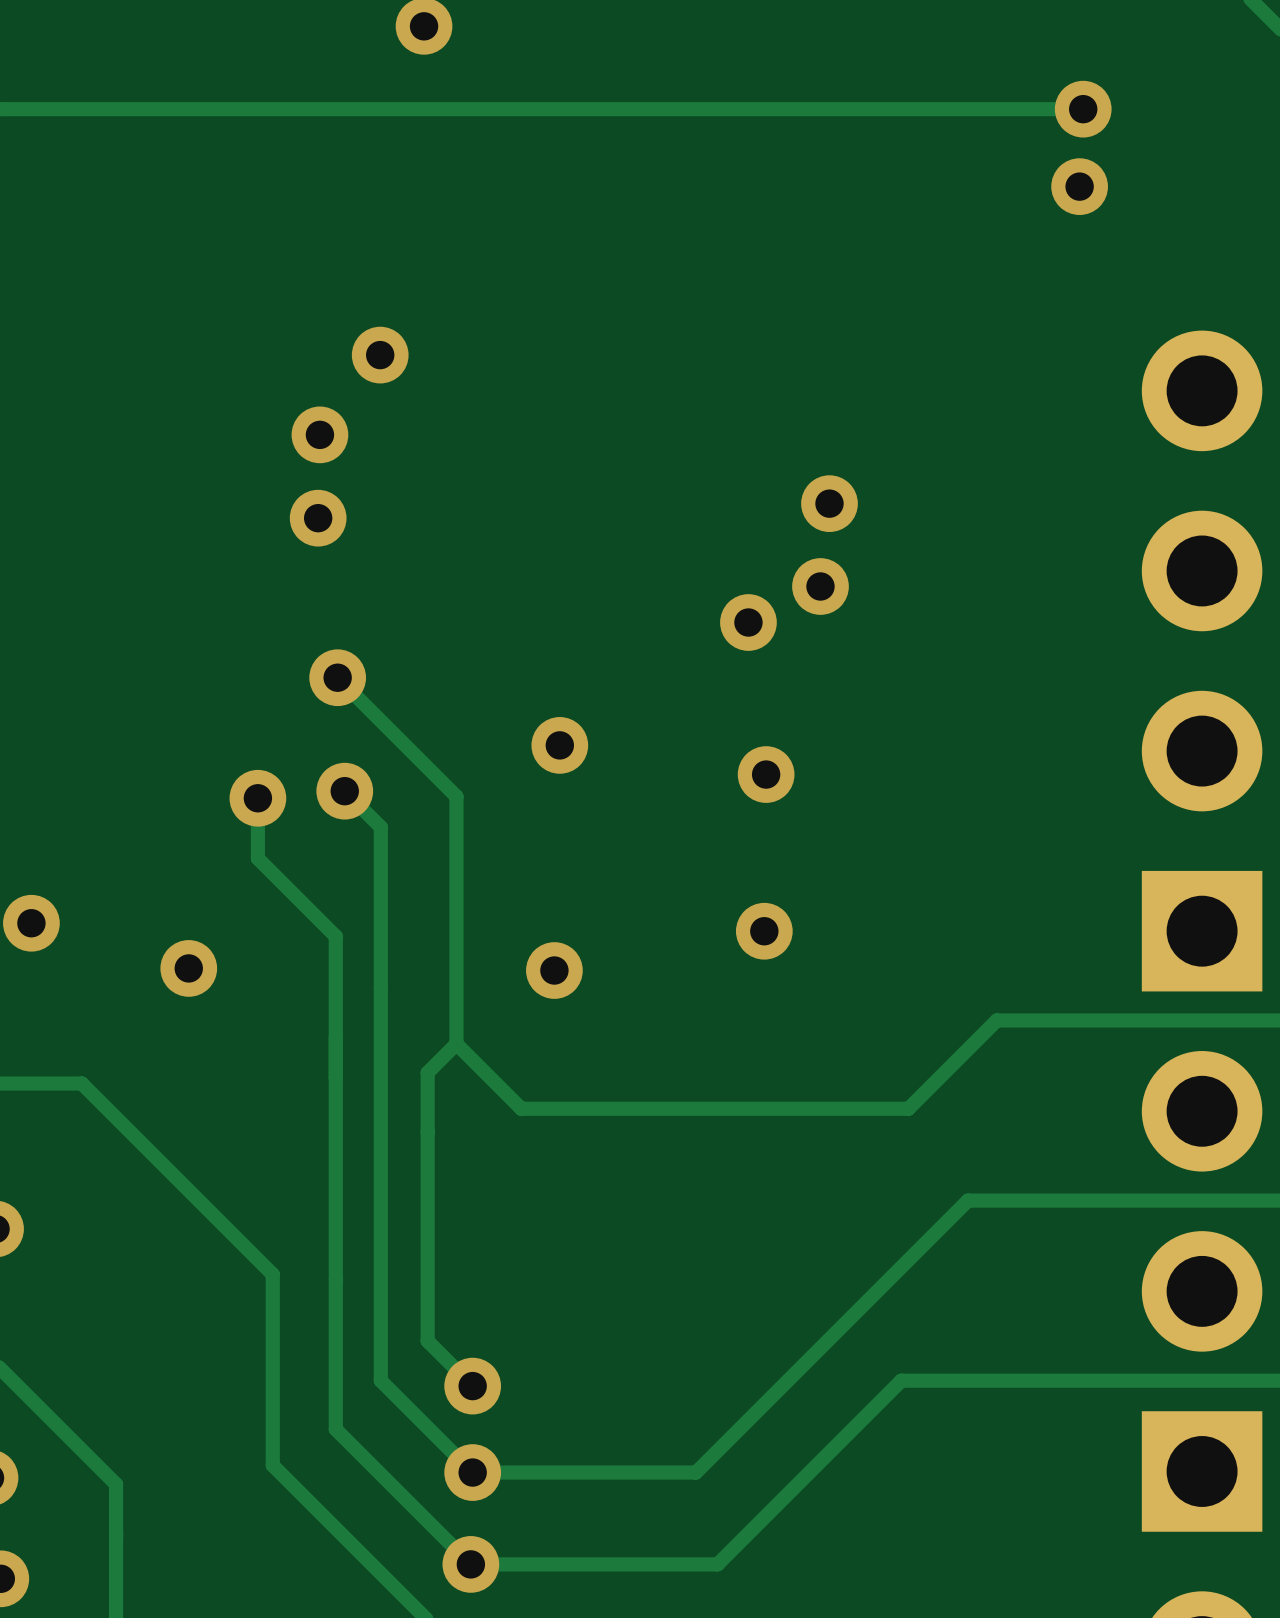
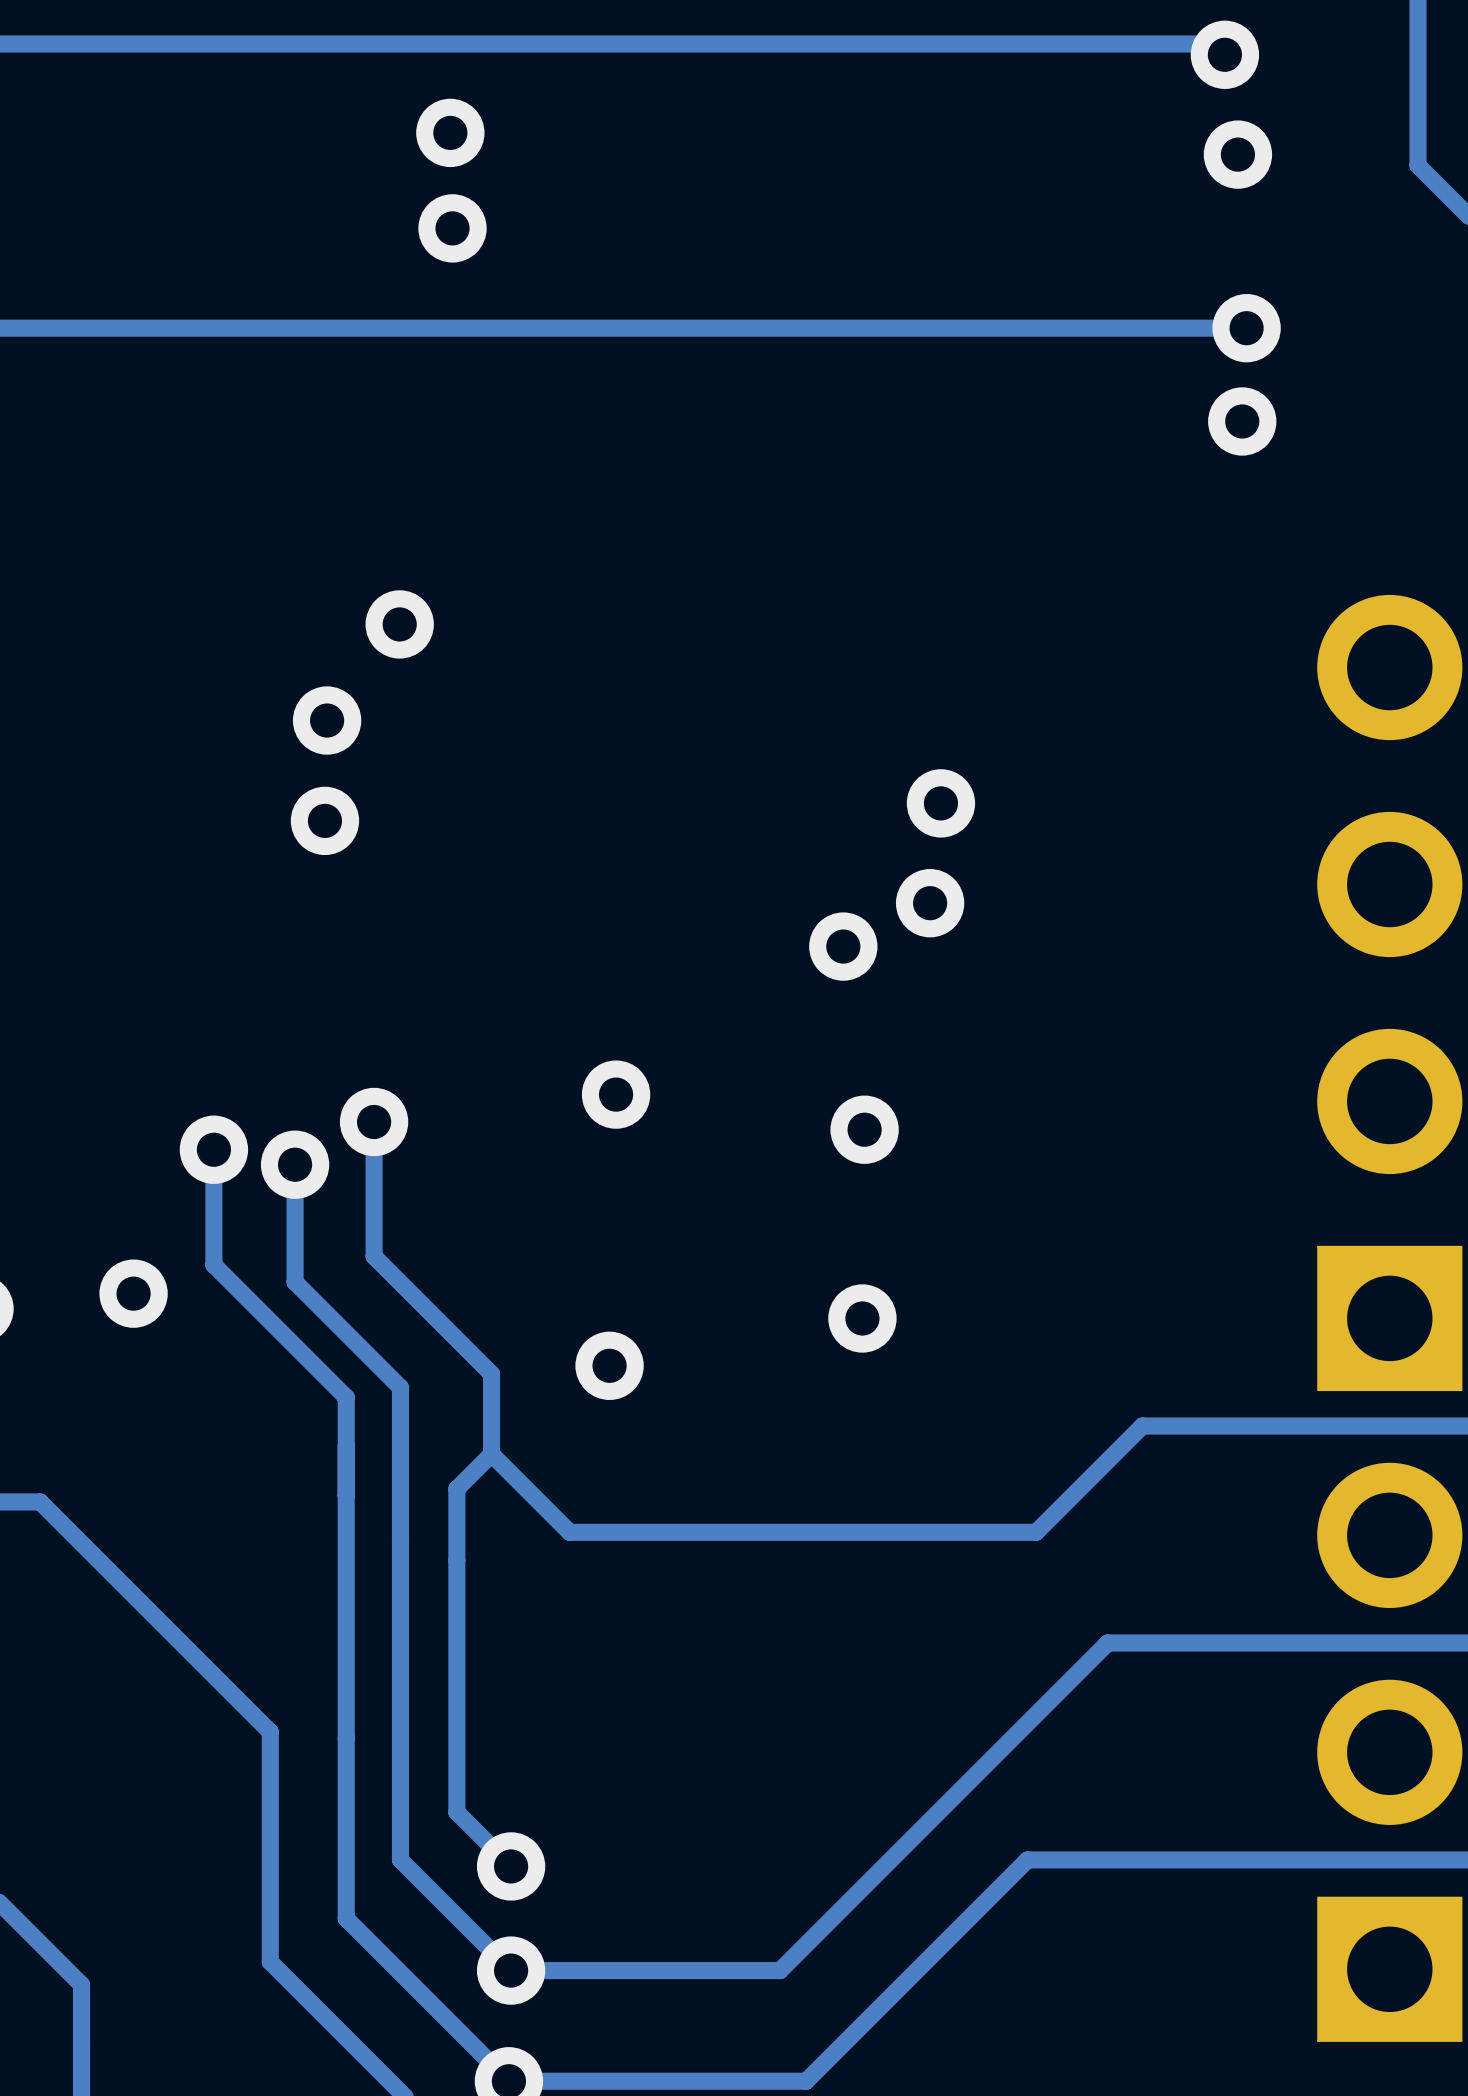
track: (337, 677) (456, 796) (456, 977) -> (374, 1121) (374, 1256) (491, 1373)
via: (337, 677) -> none
via: none -> (374, 1121)
via: none -> (213, 1149)
track: (344, 791) (380, 827) (380, 988) -> (295, 1164) (295, 1282) (400, 1387)
via: (344, 791) -> none
track: (257, 798) (257, 858) (335, 936) (335, 996) -> (213, 1149) (213, 1265) (346, 1397)
via: (257, 798) -> none
via: none -> (295, 1164)
via position: (188, 968) -> (133, 1293)

